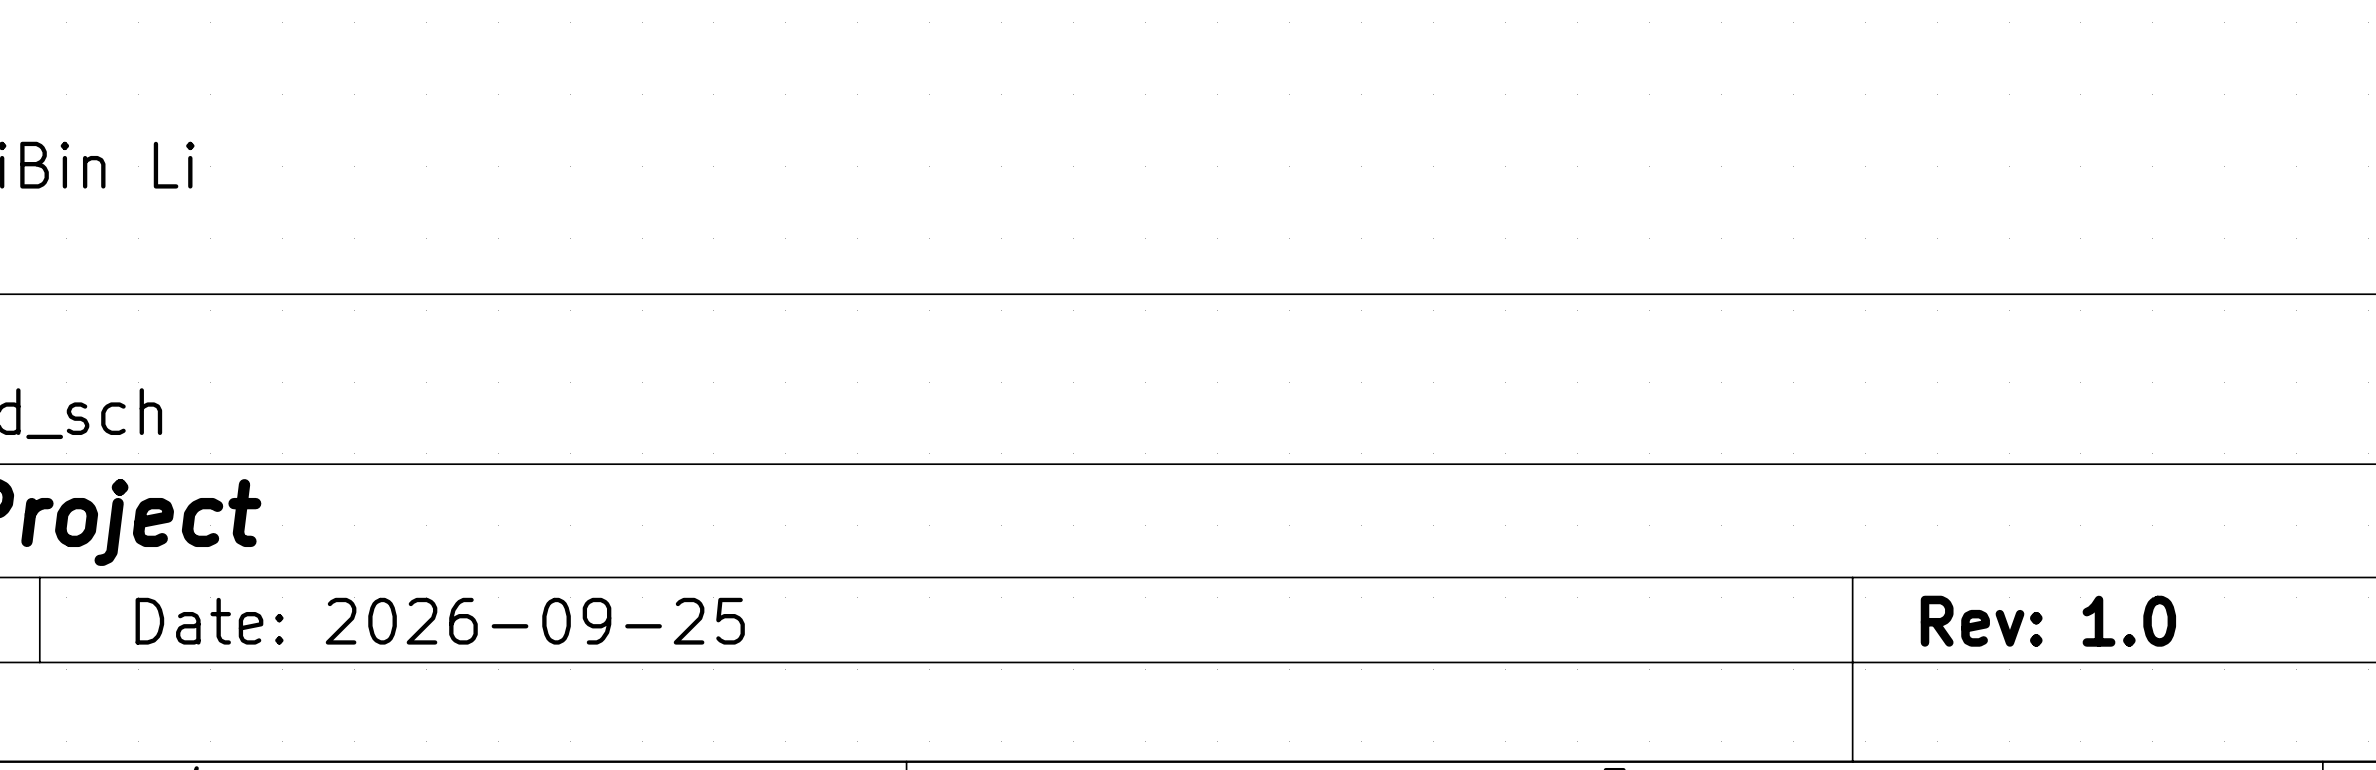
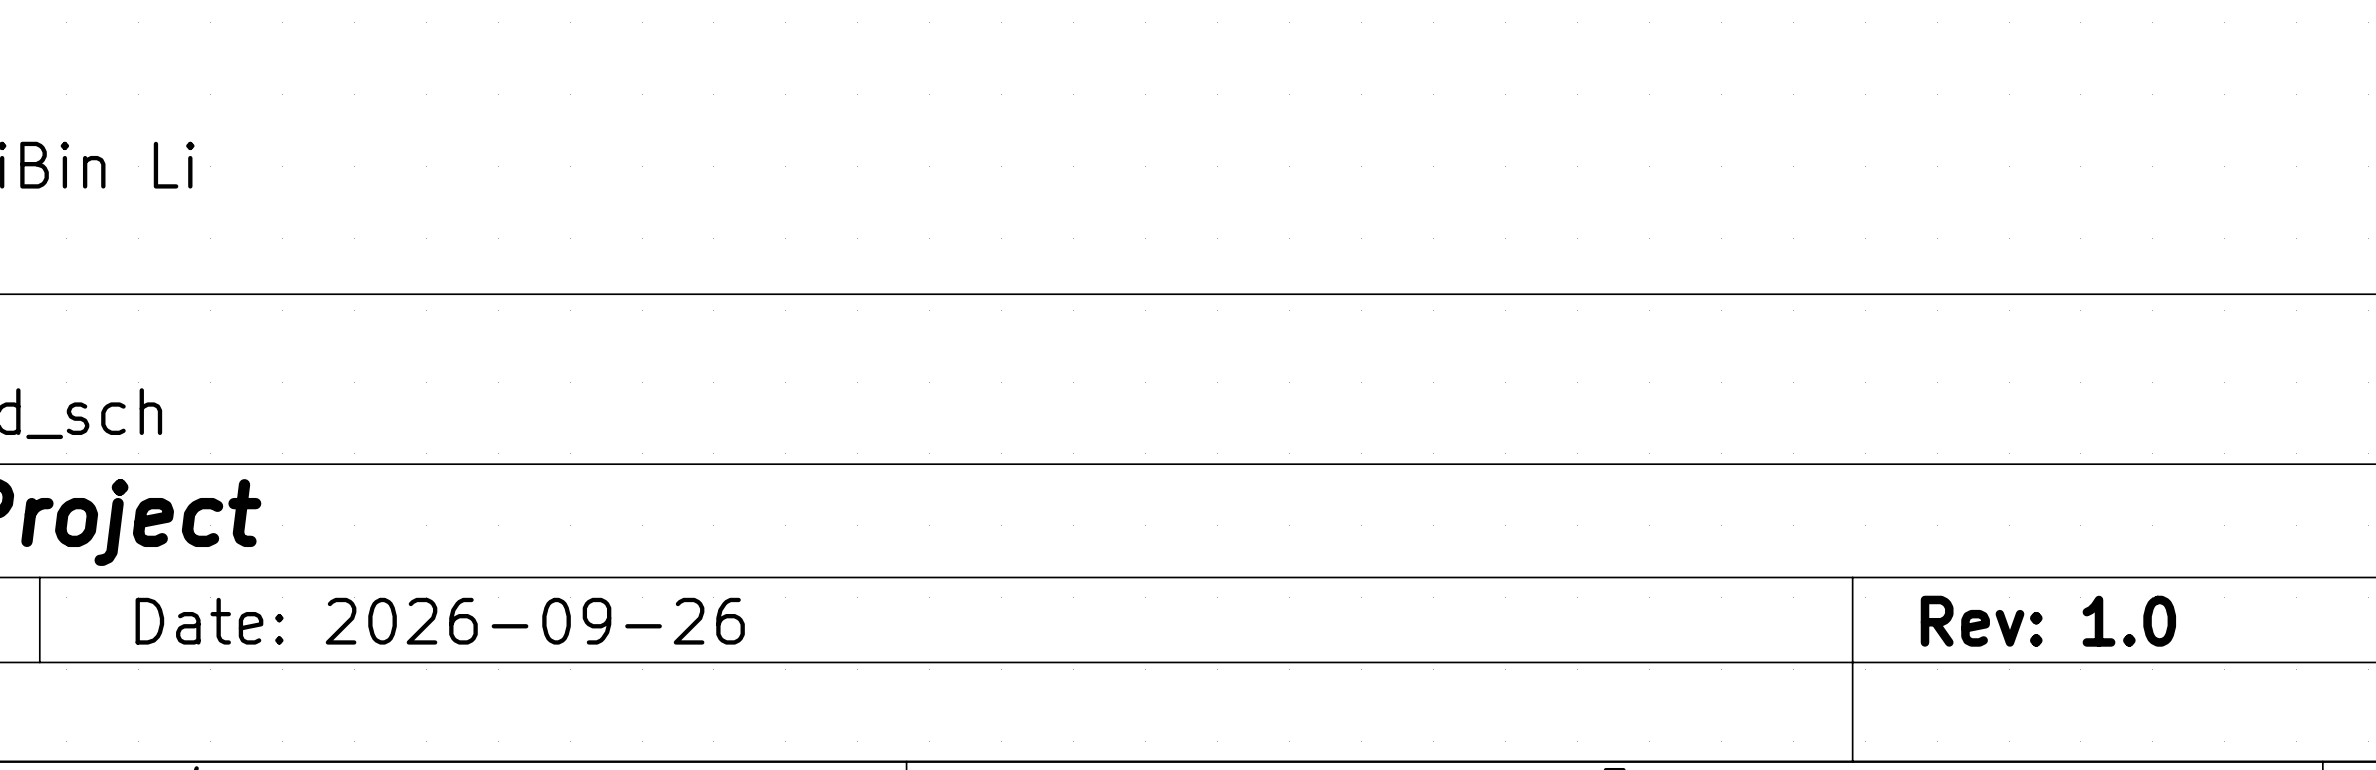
title block: Date: 2026-09-25 (440, 621) -> Date: 2026-09-26 (440, 621)

